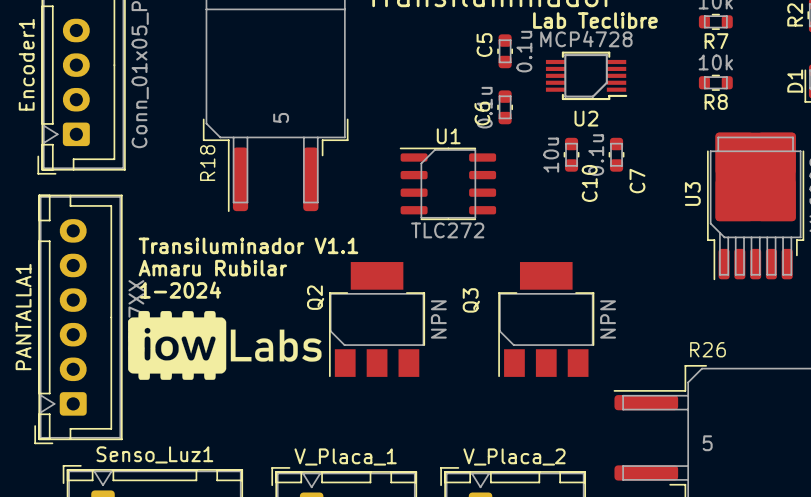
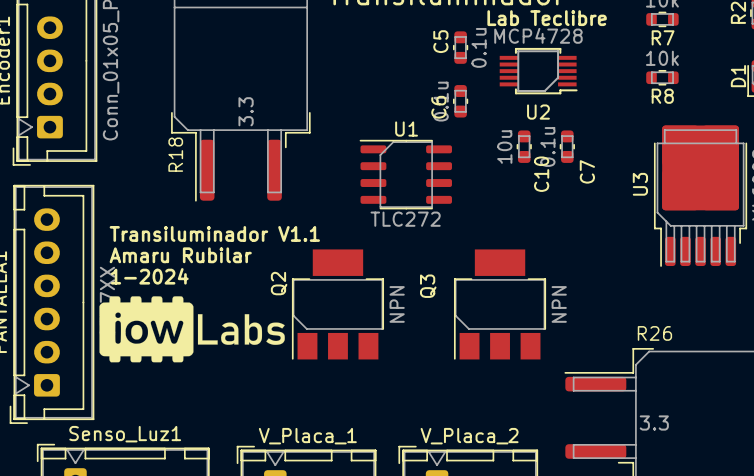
R18 value: 5 (281, 117) -> 3.3 (246, 111)
R26 value: 5 (707, 443) -> 3.3 (654, 423)

